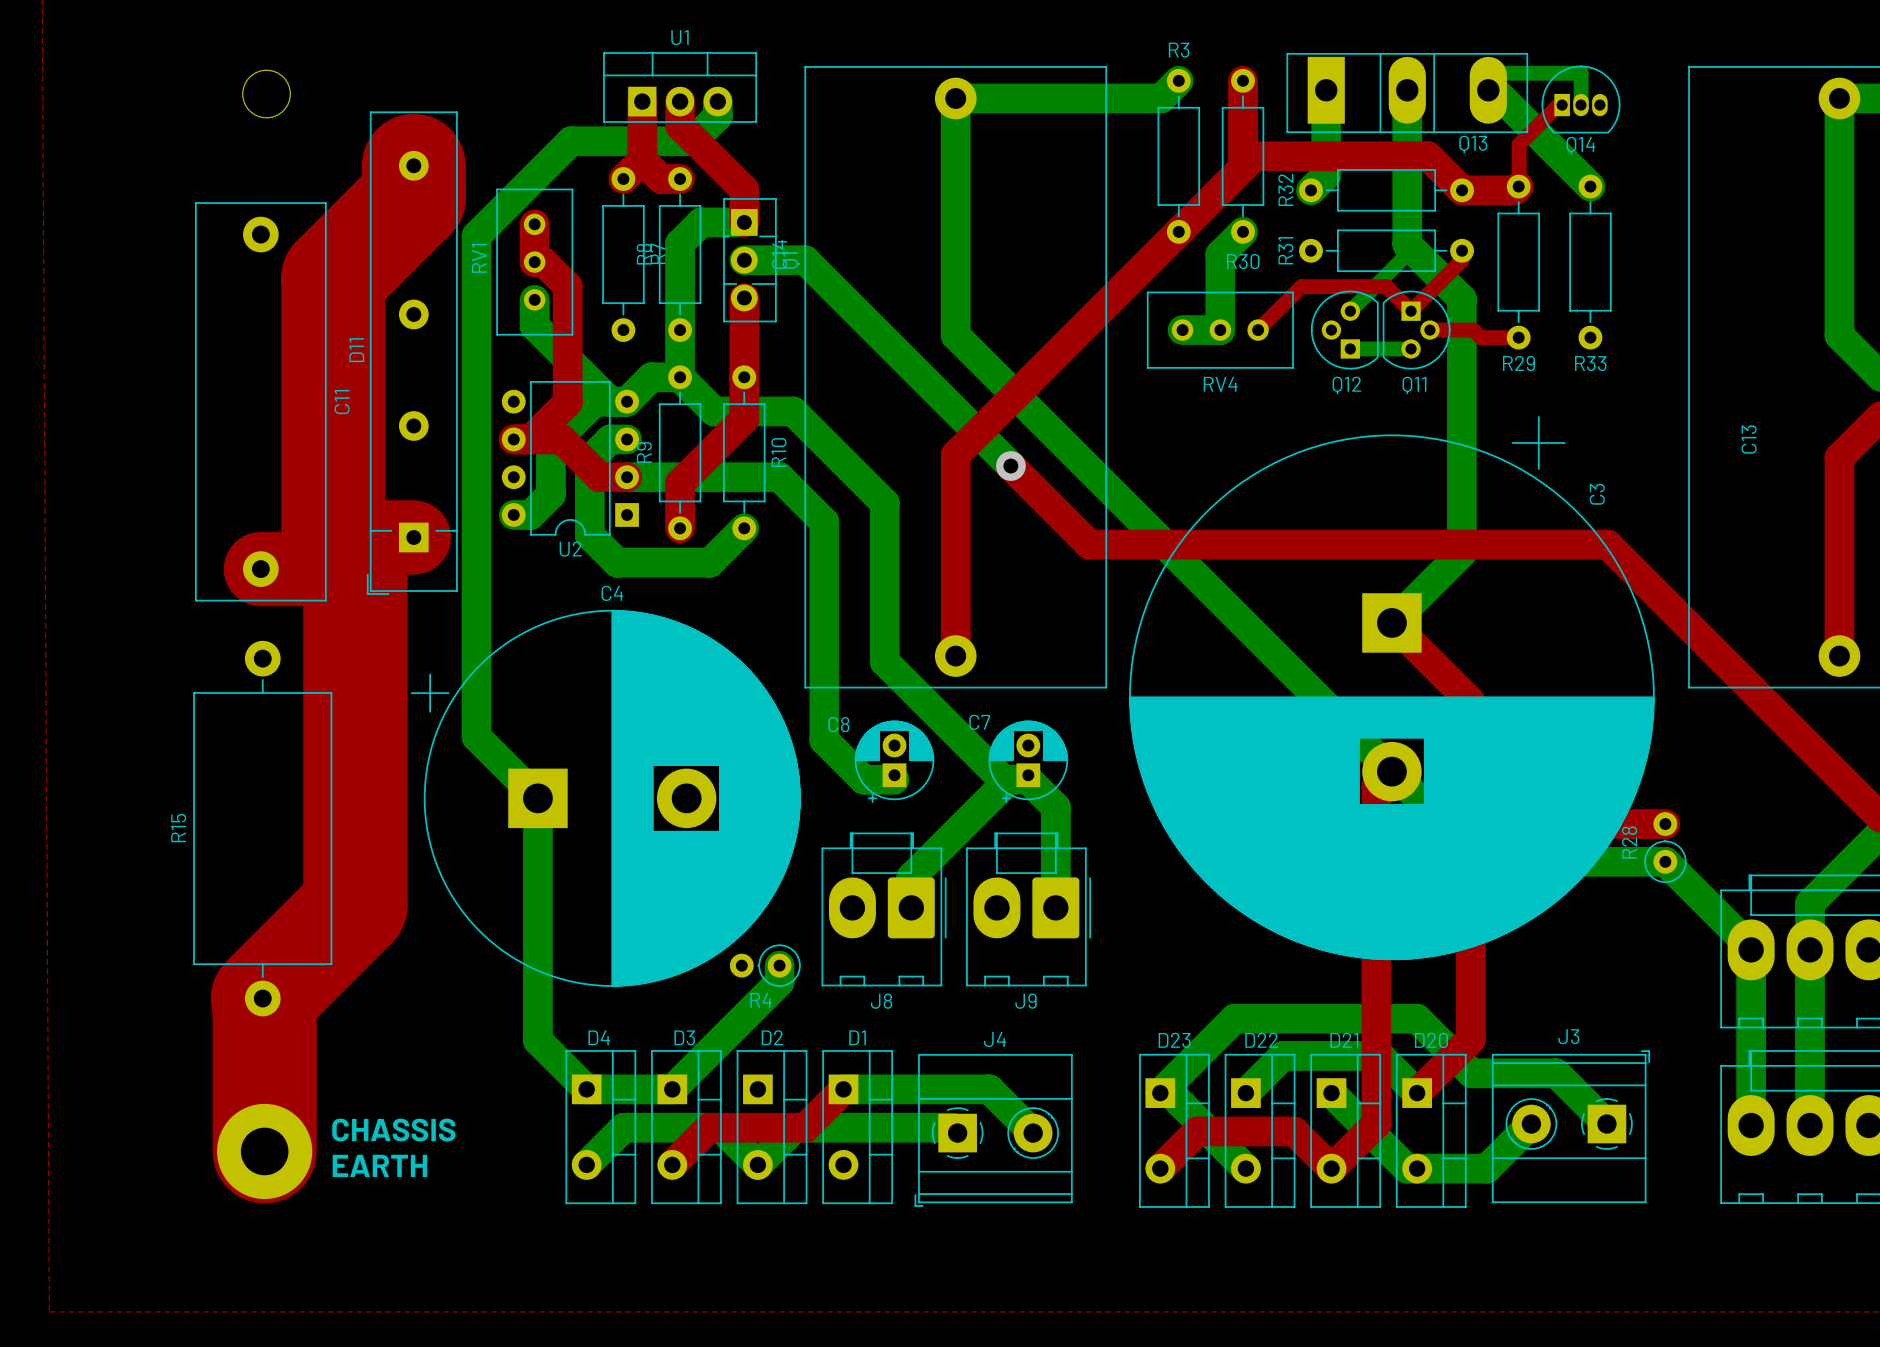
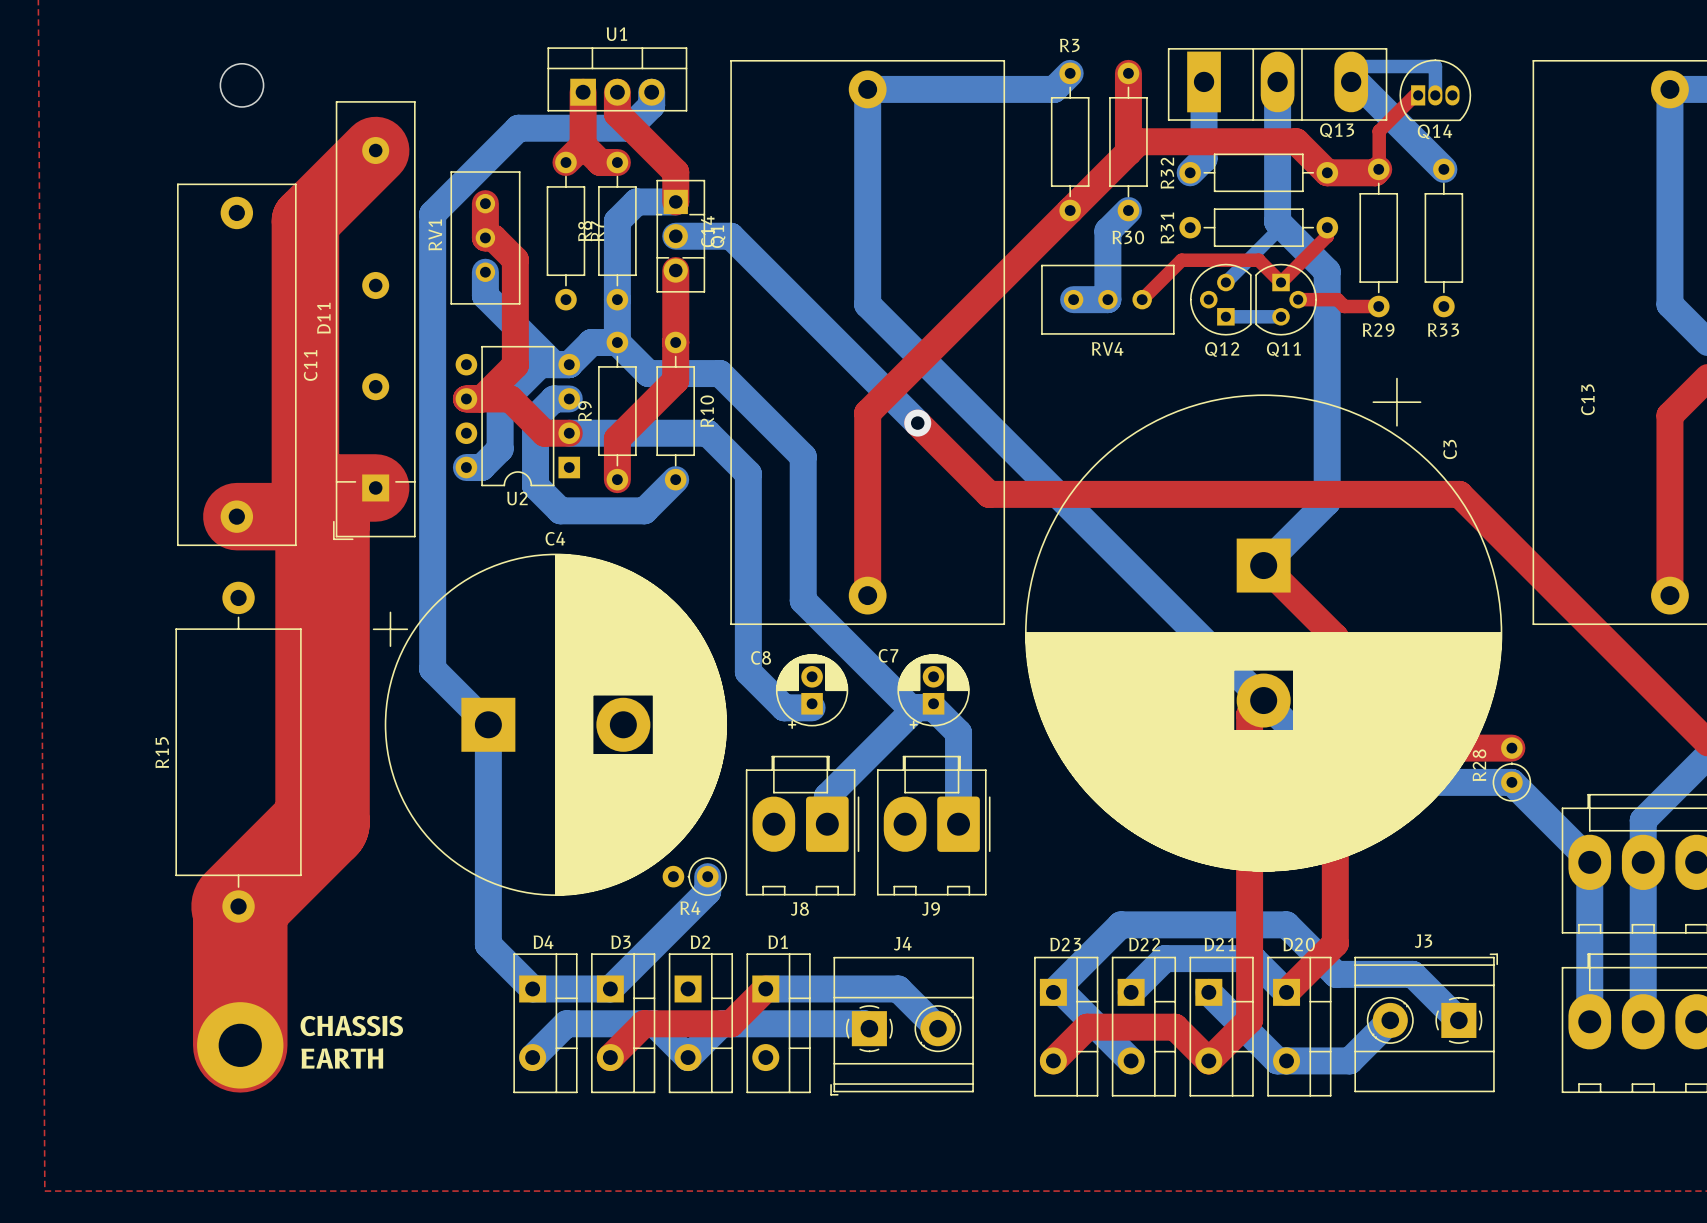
top track: (413, 165) (413, 197) (333, 277) (333, 554) (336, 557) -> (375, 150) (305, 220) (305, 506)

